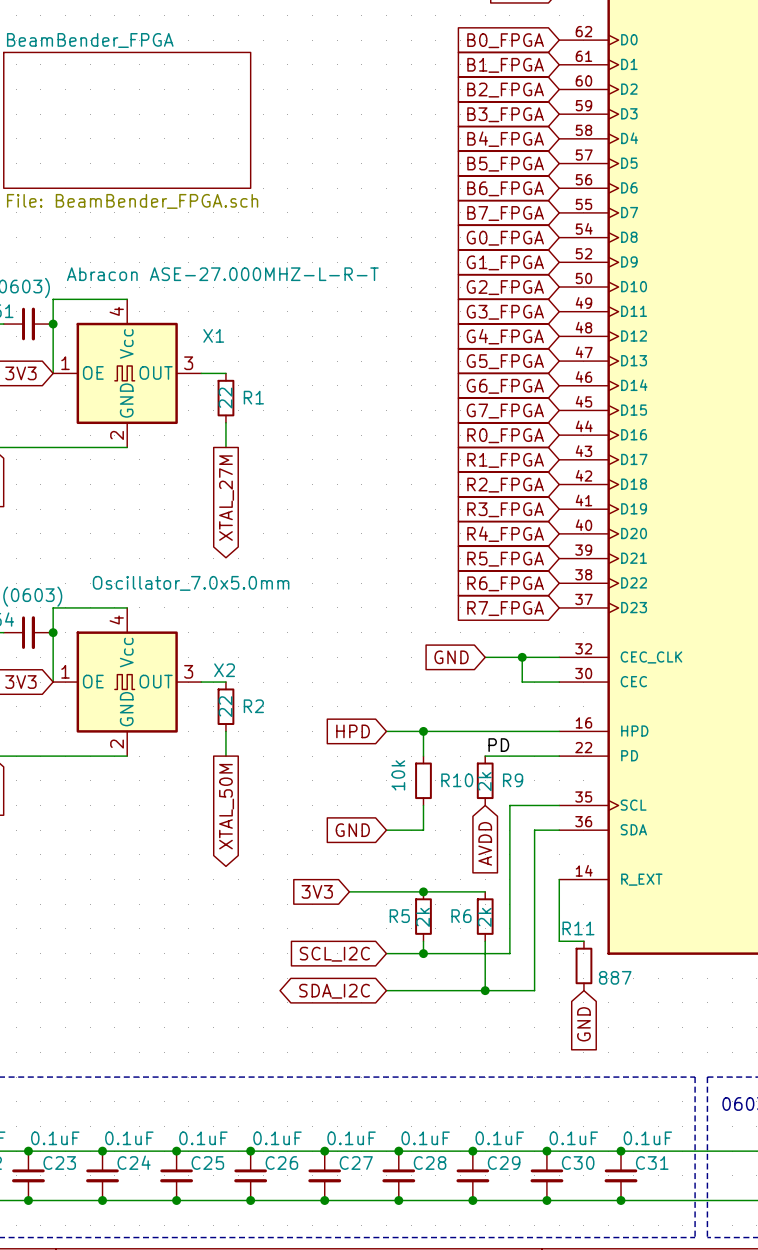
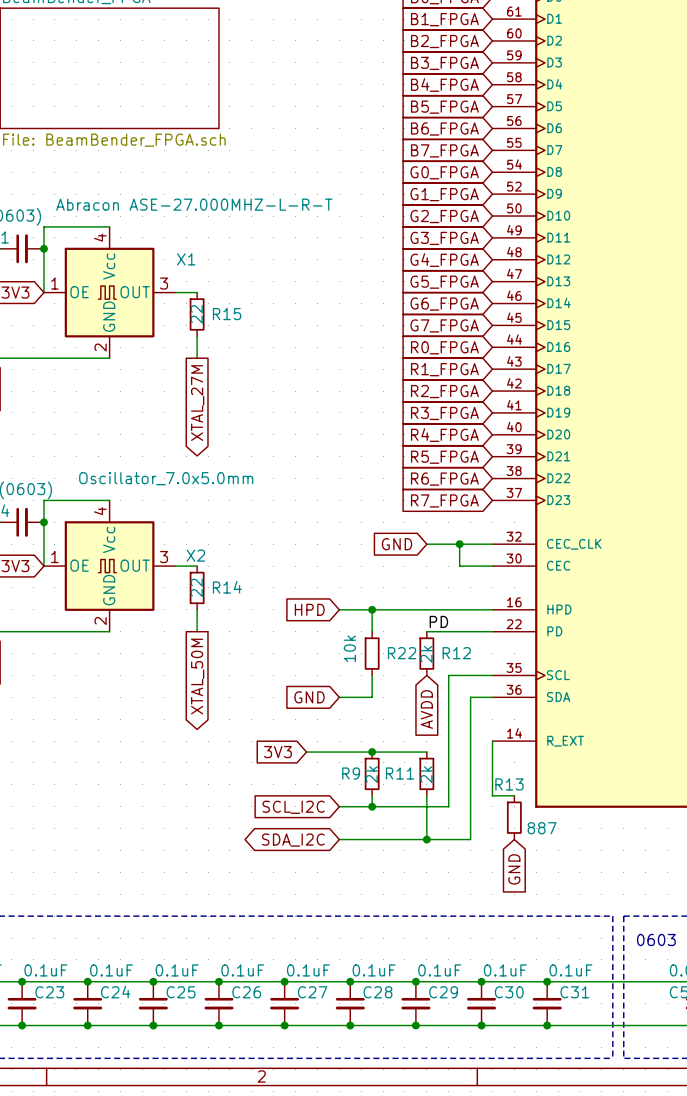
R1 name: R1 (253, 397) -> R15 (227, 314)
R2 name: R2 (253, 706) -> R14 (227, 587)
R10 name: R10 (457, 780) -> R22 (402, 653)
R9 name: R9 (513, 780) -> R12 (456, 653)
R5 name: R5 (399, 916) -> R9 (351, 773)
R6 name: R6 (461, 916) -> R11 (400, 773)
R11 name: R11 (578, 928) -> R13 (509, 784)

